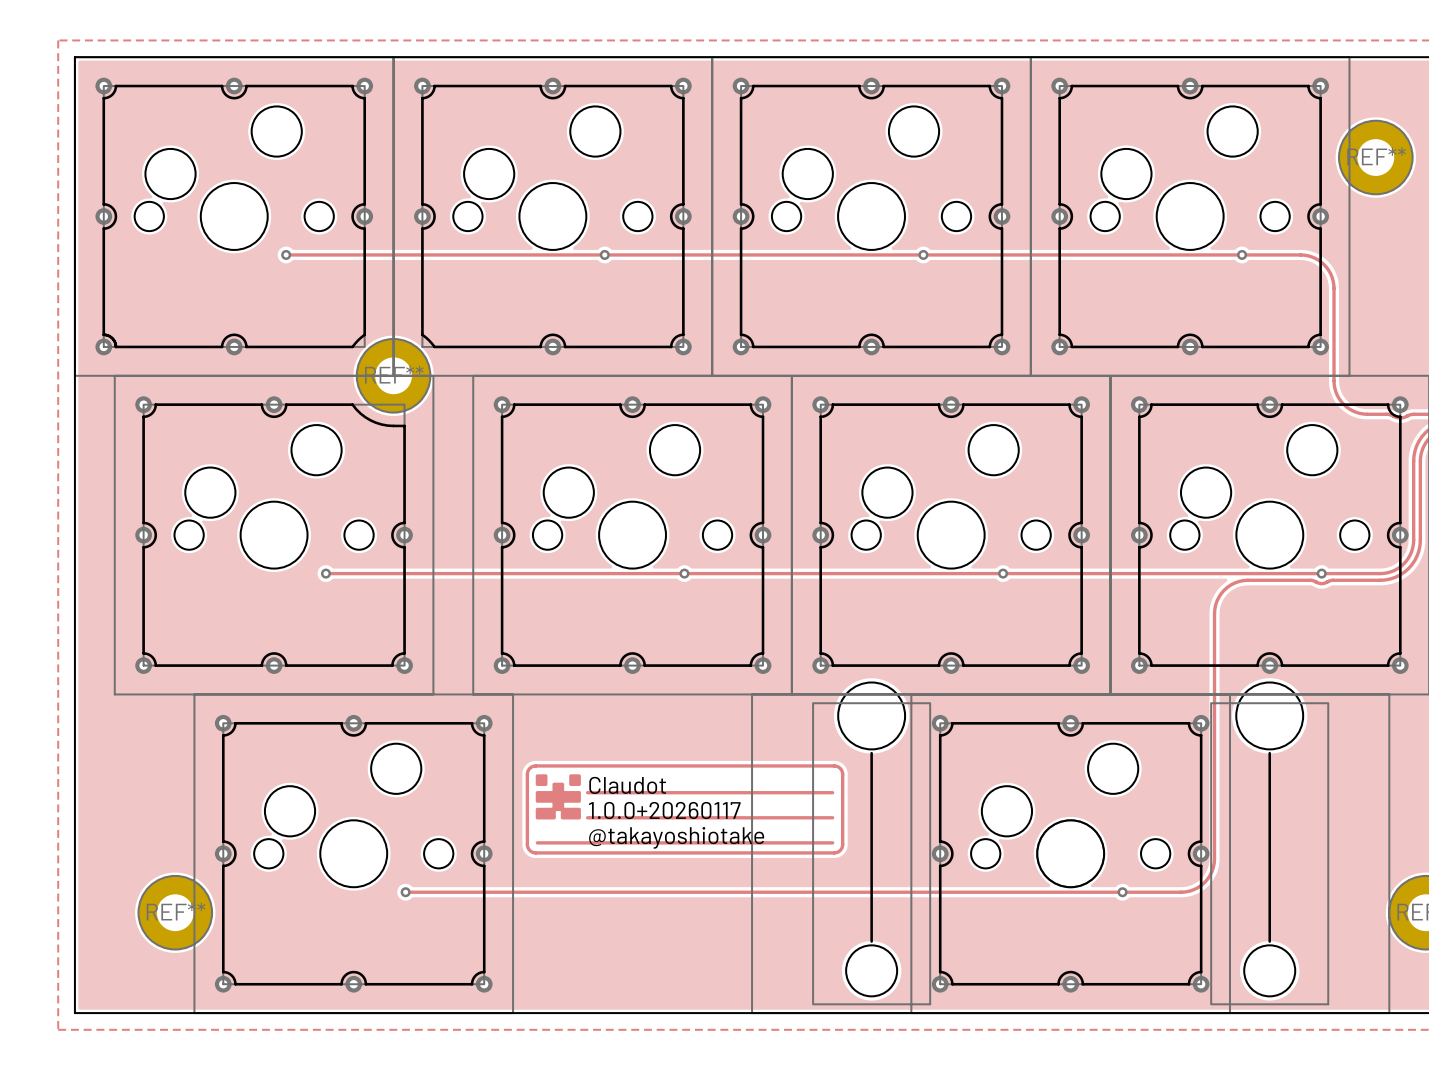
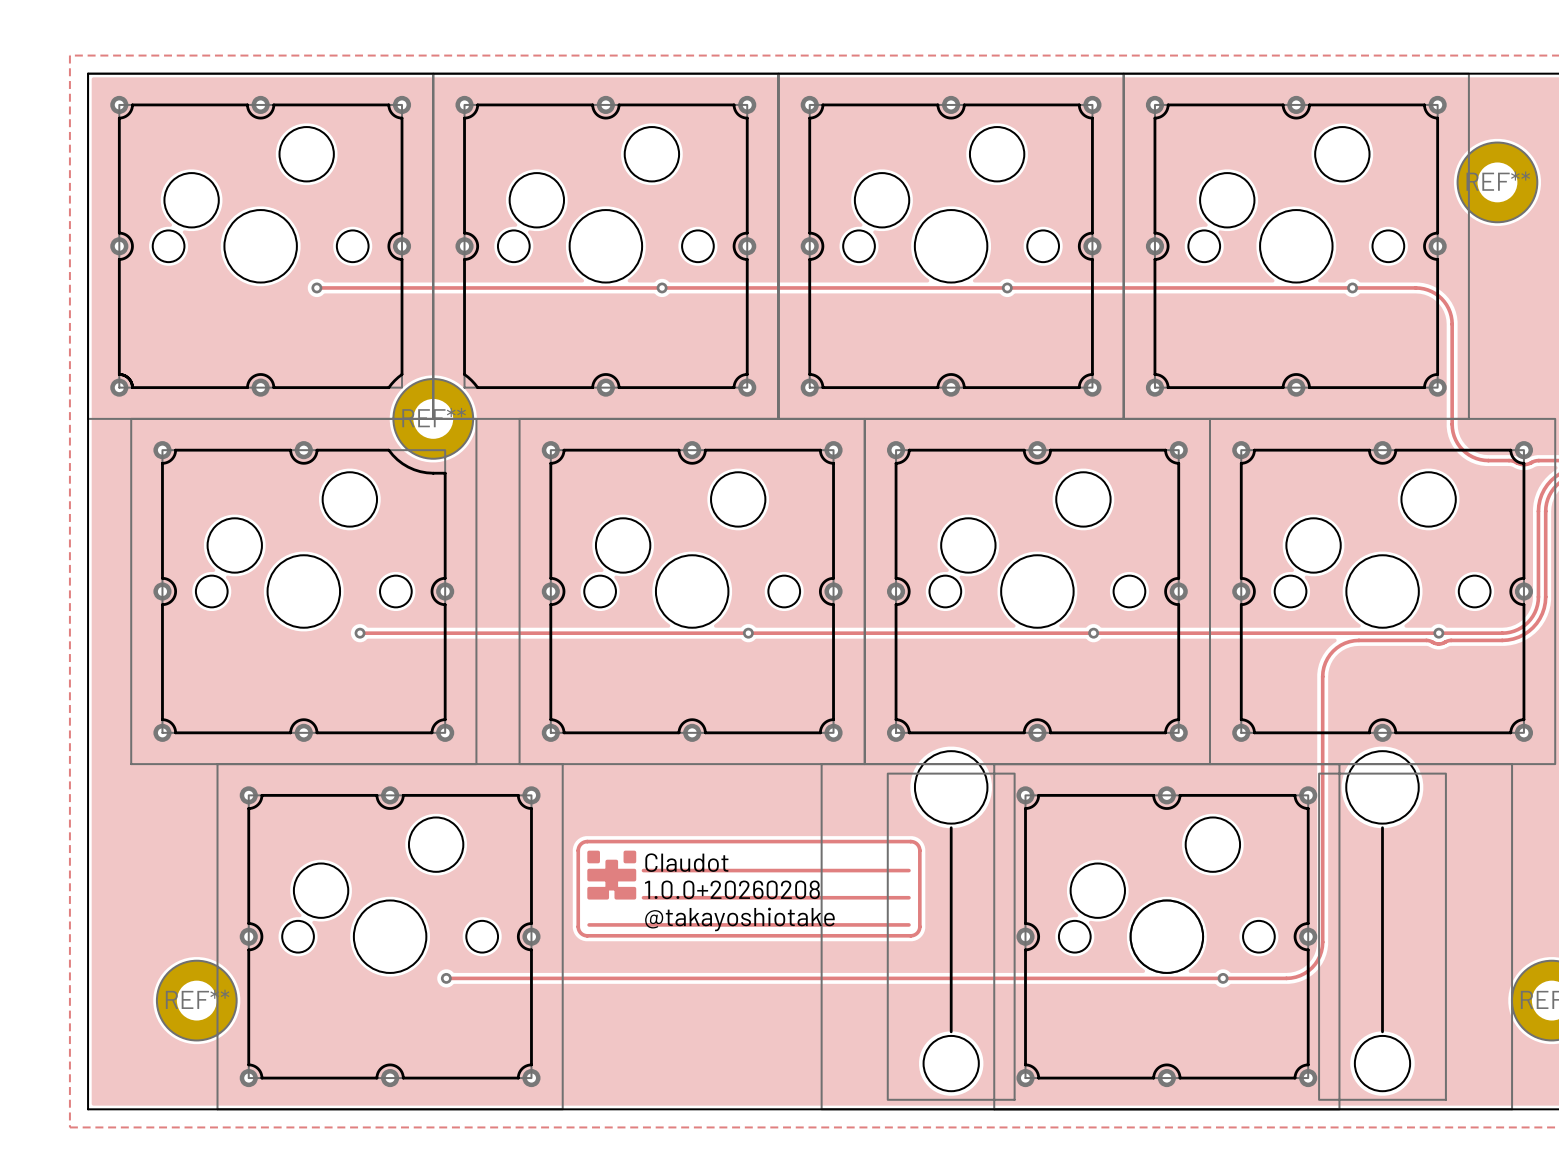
text: 1.0.0+20260117 (664, 810) -> 1.0.0+20260208 (732, 889)

